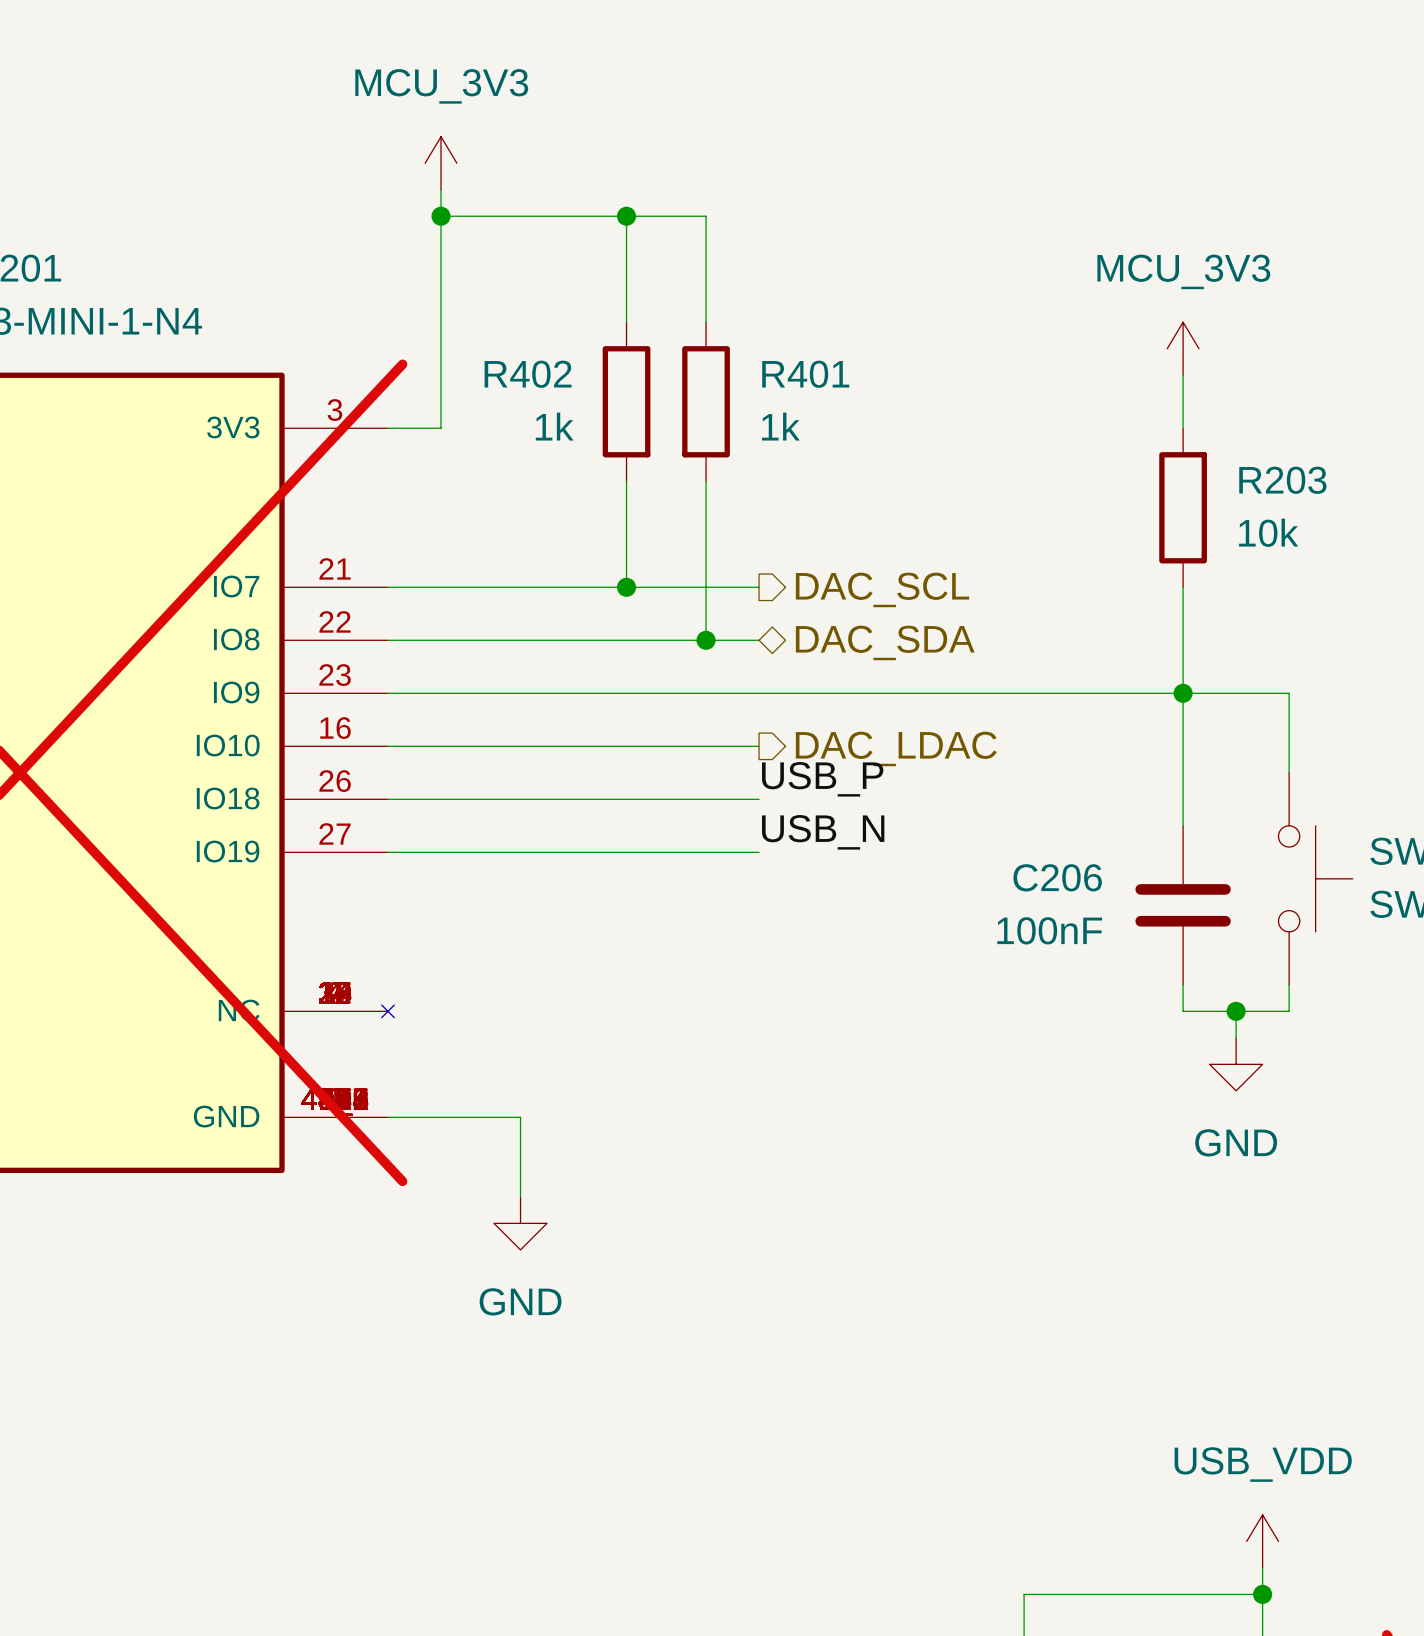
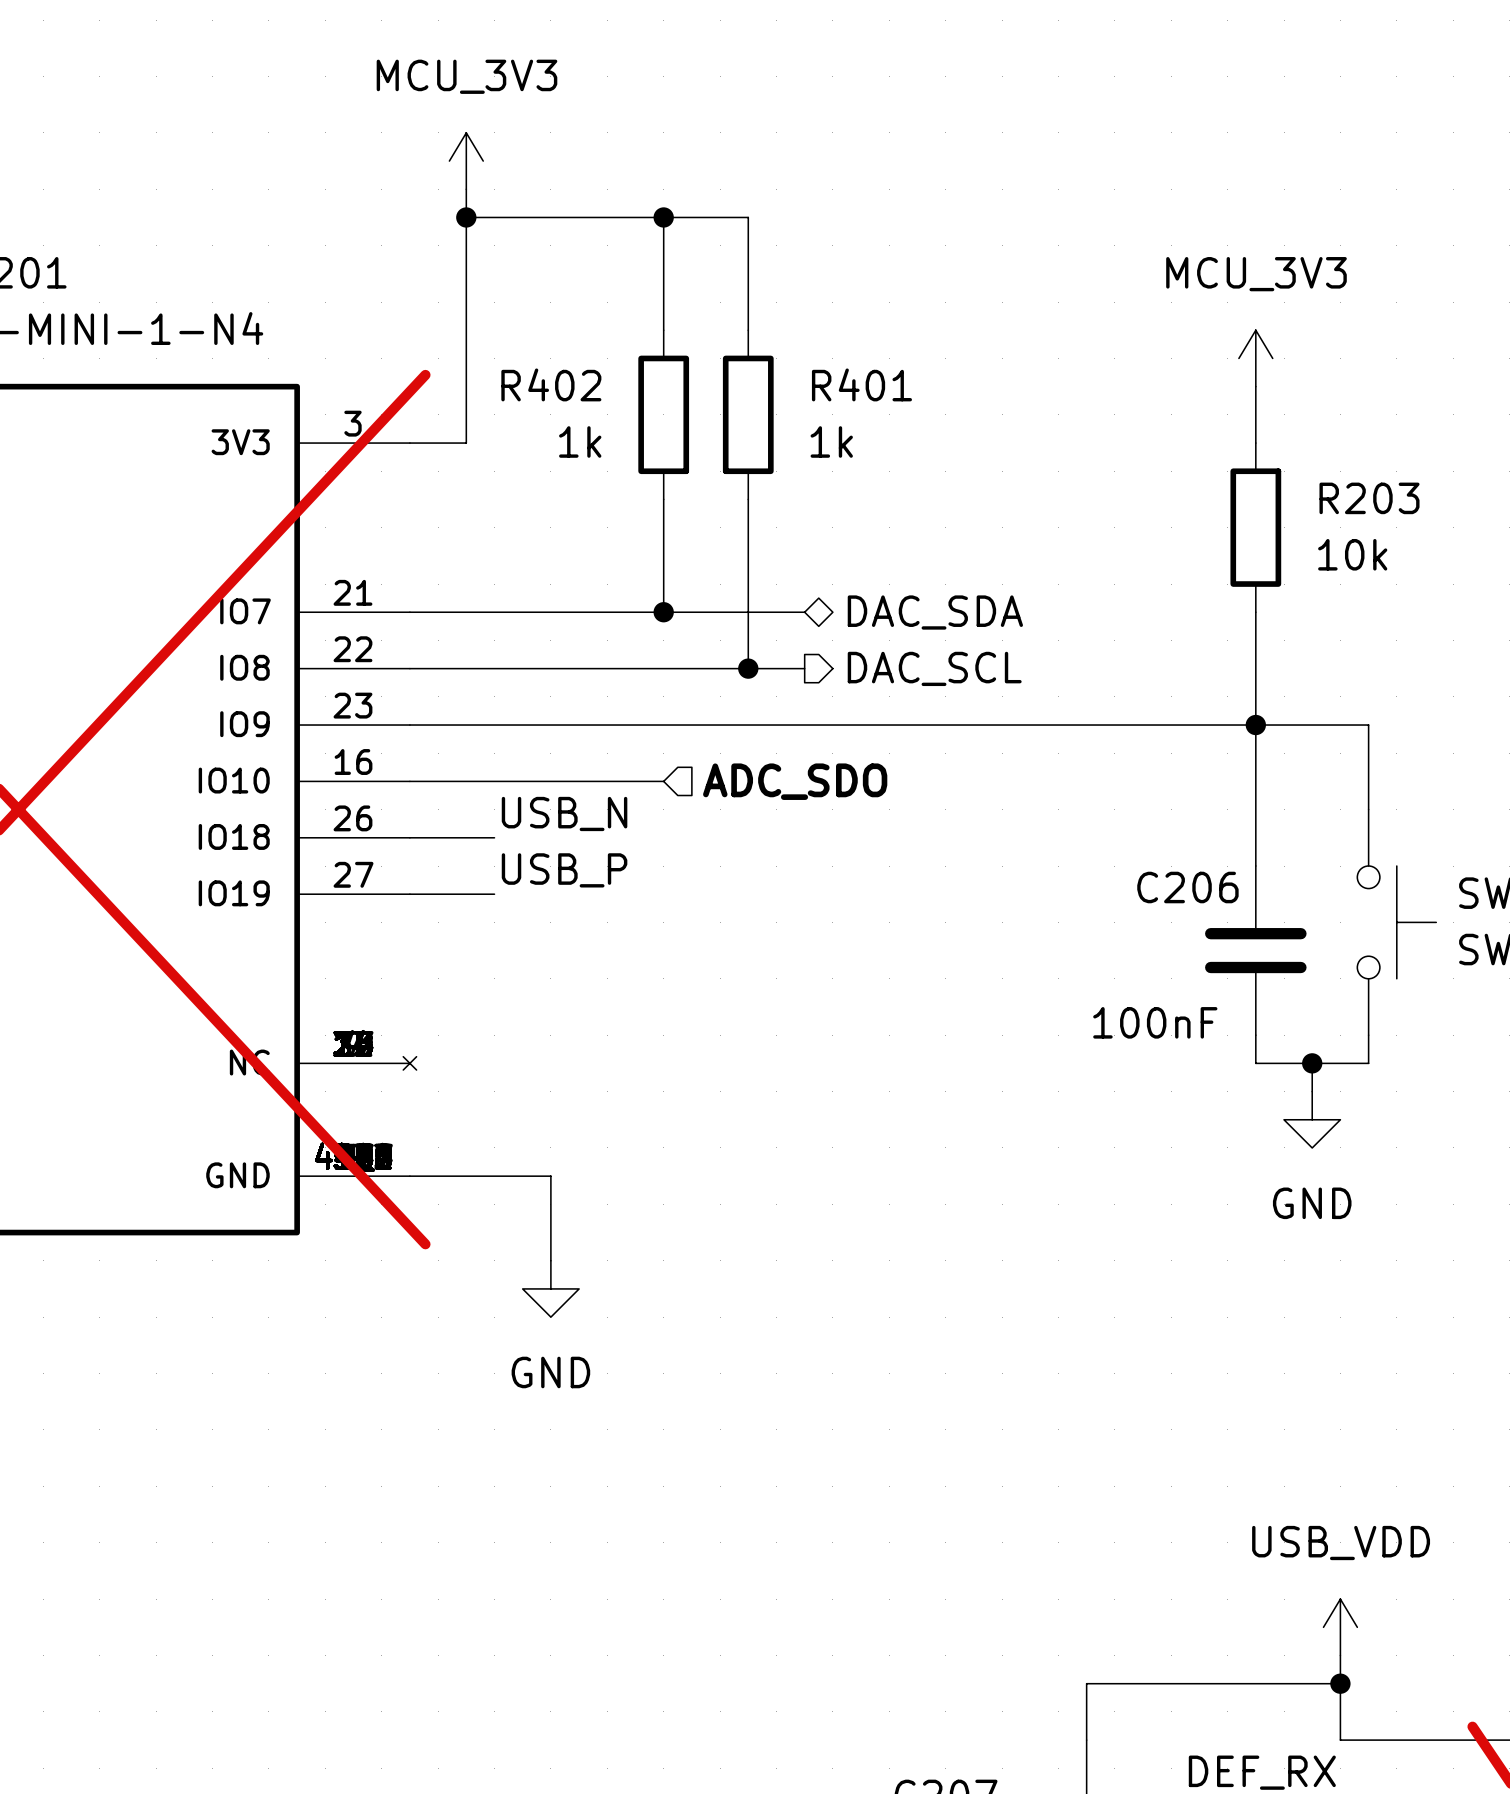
hierarchical label shape: output (882, 589) -> bidirectional (935, 612)
hierarchical label: DAC_SCL (882, 589) -> DAC_SDA (935, 612)
hierarchical label shape: bidirectional (885, 642) -> output (934, 668)
hierarchical label: DAC_SDA (885, 642) -> DAC_SCL (934, 668)
wire: (626, 746) (759, 746) -> none
hierarchical label: none -> ADC_SDO (795, 781)
hierarchical label: DAC_LDAC (896, 748) -> none
label position: USB_P (822, 779) -> USB_P (564, 870)
wire: (467, 799) (759, 799) -> none
label position: USB_N (823, 832) -> USB_N (564, 813)
wire: (467, 852) (759, 852) -> none
C206 name position: C206 (1057, 877) -> C206 (1187, 887)
C206 value position: 100nF (1049, 930) -> 100nF (1155, 1022)

